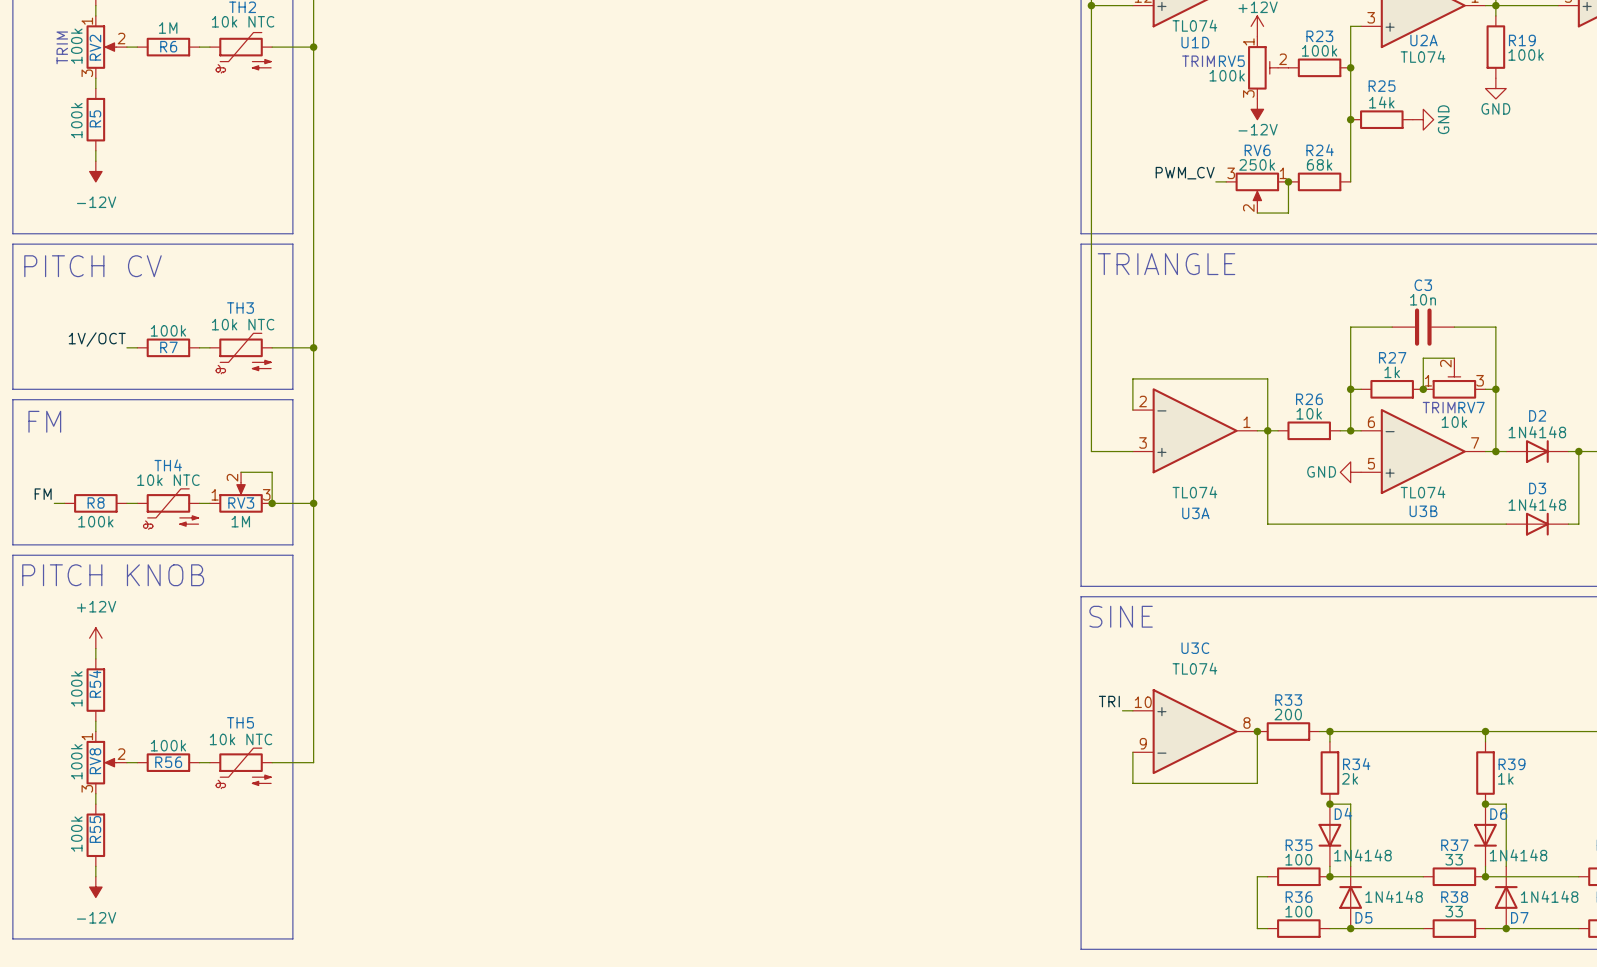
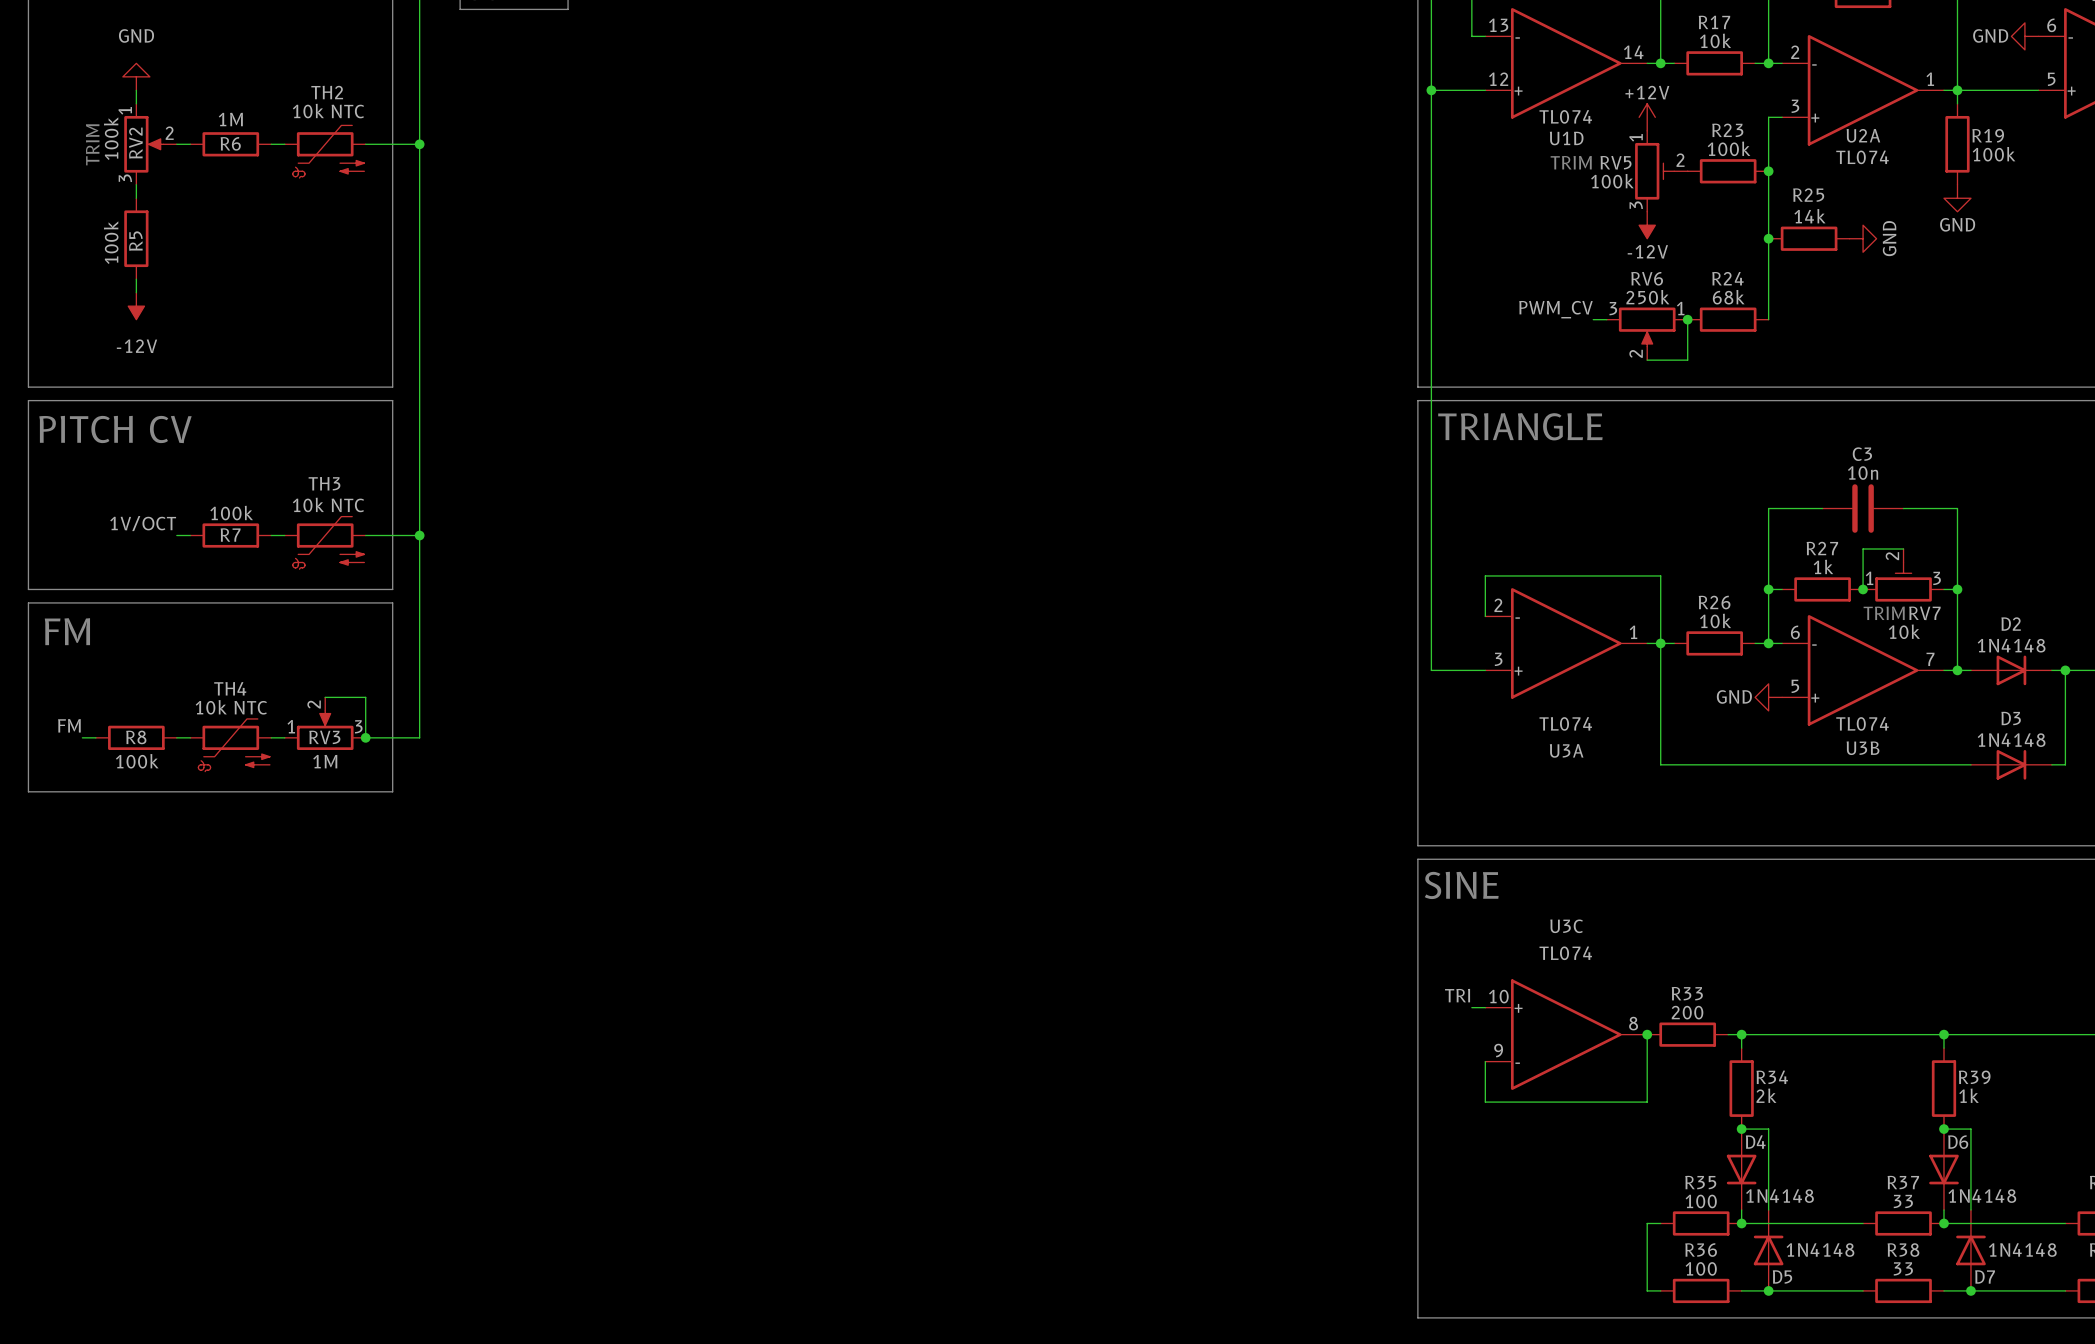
wire: (313, 503) (313, 762) (272, 762) -> none
junction: (313, 503) -> none
line: (12, 555) (292, 555) (292, 938) (12, 938) (12, 555) -> none
text: PITCH KNOB (113, 575) -> none
power symbol: +12V (95, 638) -> none
wire: (95, 648) (95, 658) -> none
R54: 100k (95, 690) -> none
wire: (95, 721) (95, 731) -> none
RV8: 100k (106, 762) -> none
wire: (126, 762) (137, 762) -> none
R56: 100k (168, 762) -> none
wire: (199, 762) (209, 762) -> none
TH5: 10k NTC (241, 768) -> none
wire: (95, 793) (95, 804) -> none
R55: 100k (95, 835) -> none
wire: (95, 866) (95, 876) -> none
power symbol: -12V (95, 887) -> none

